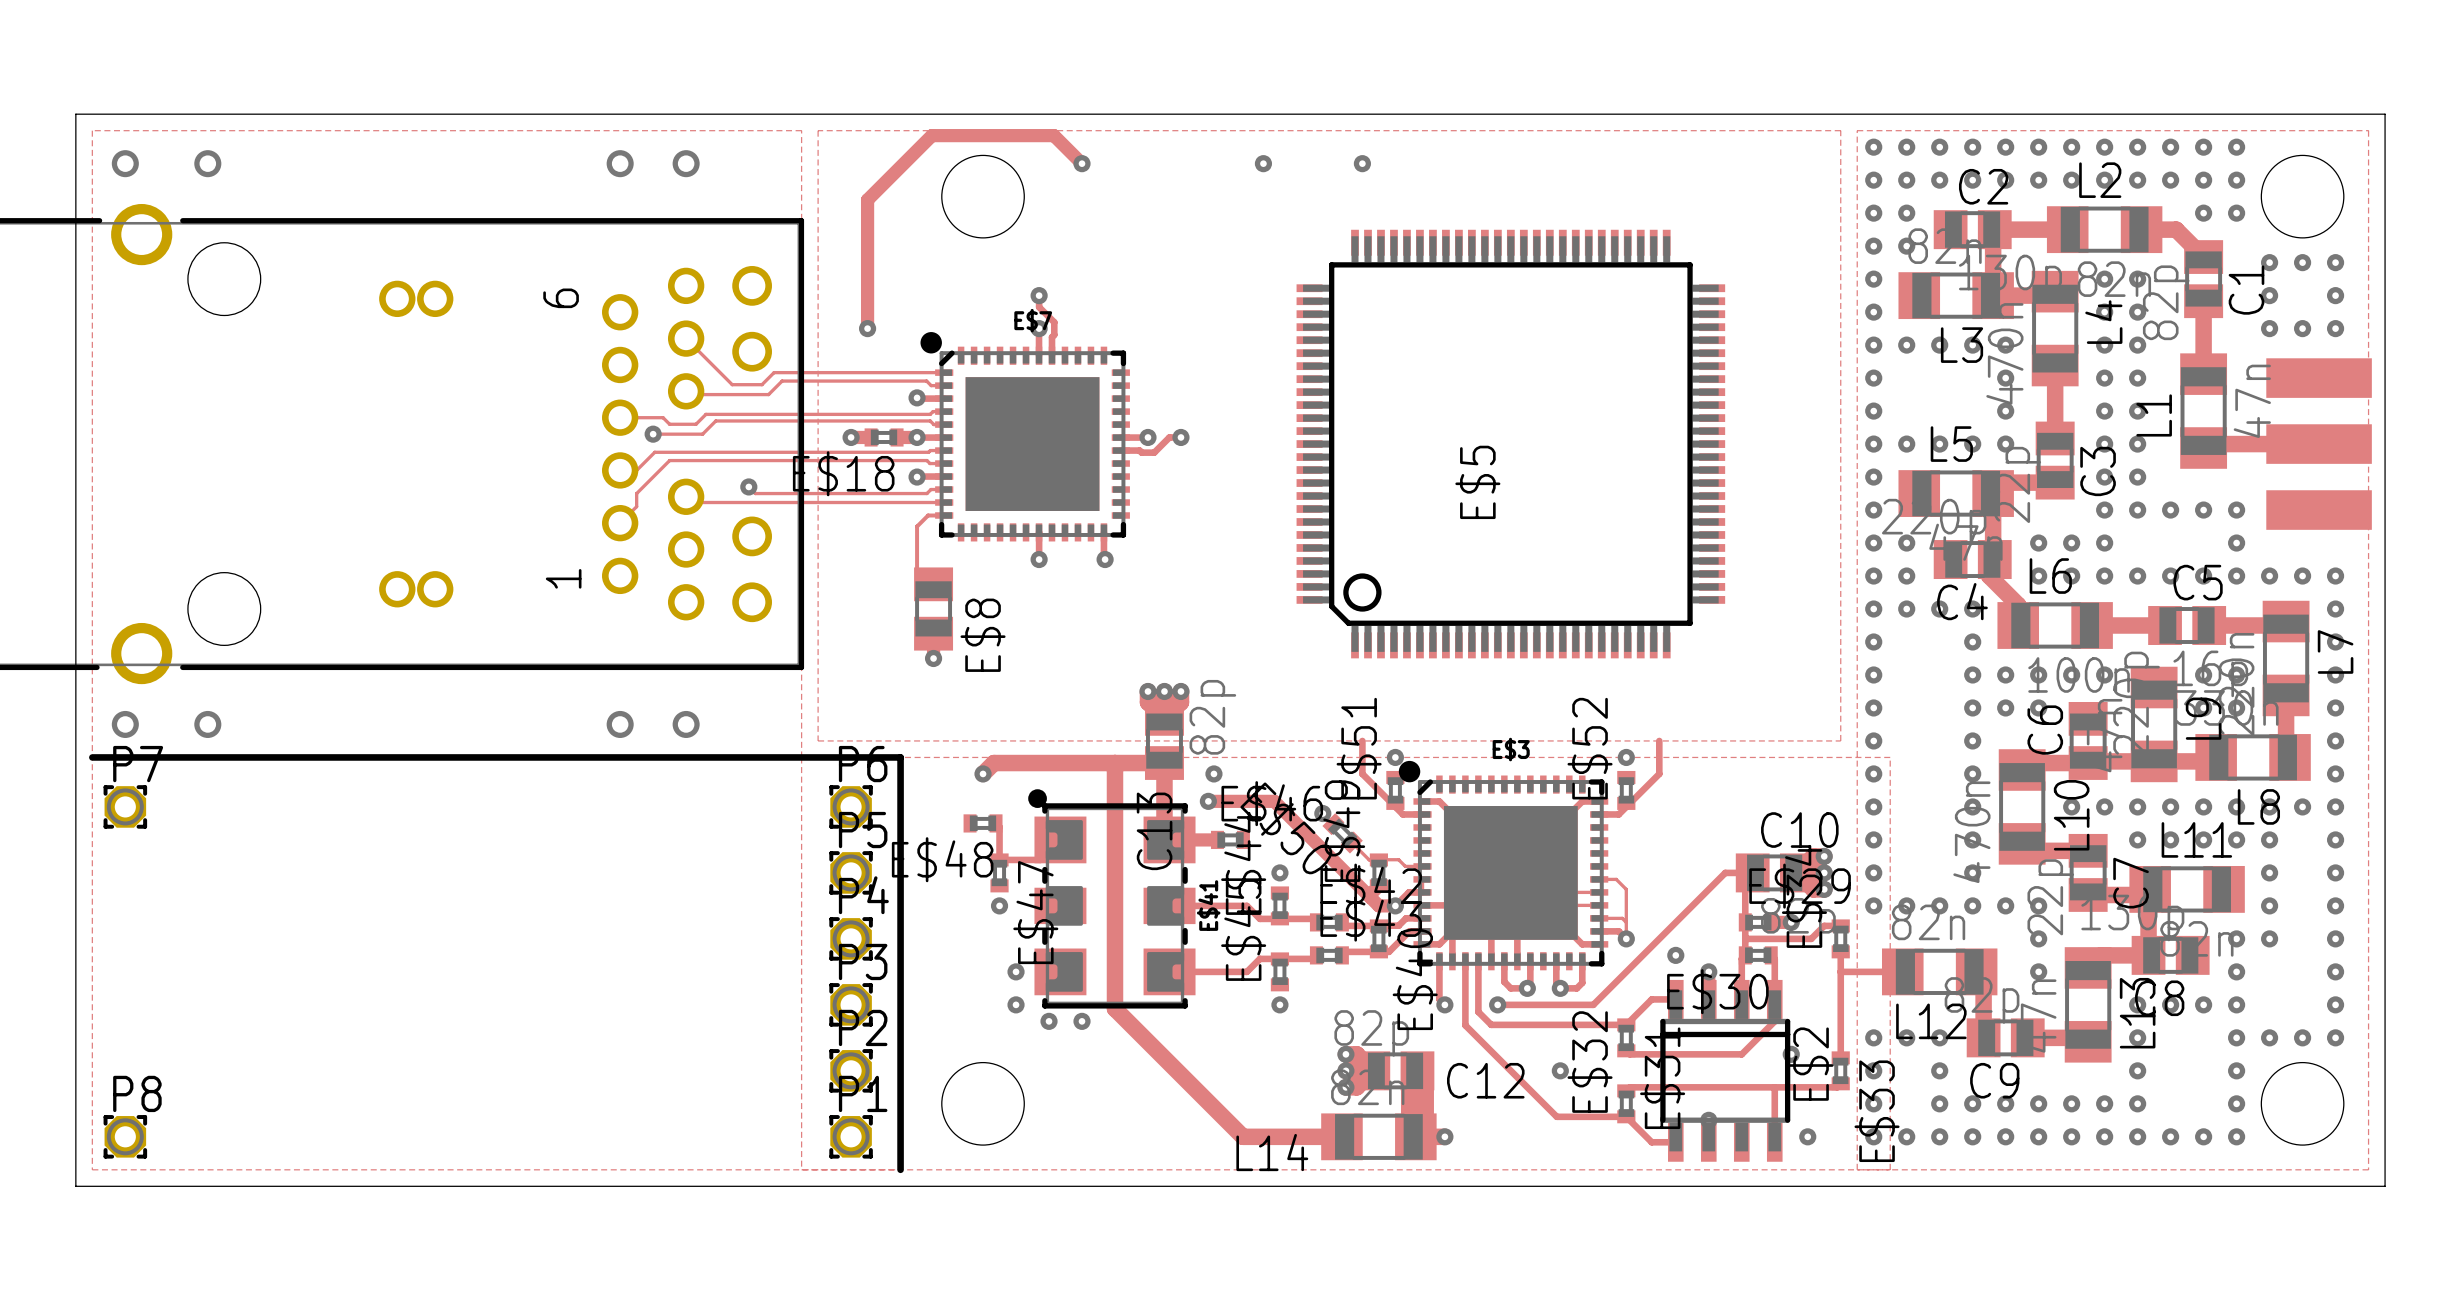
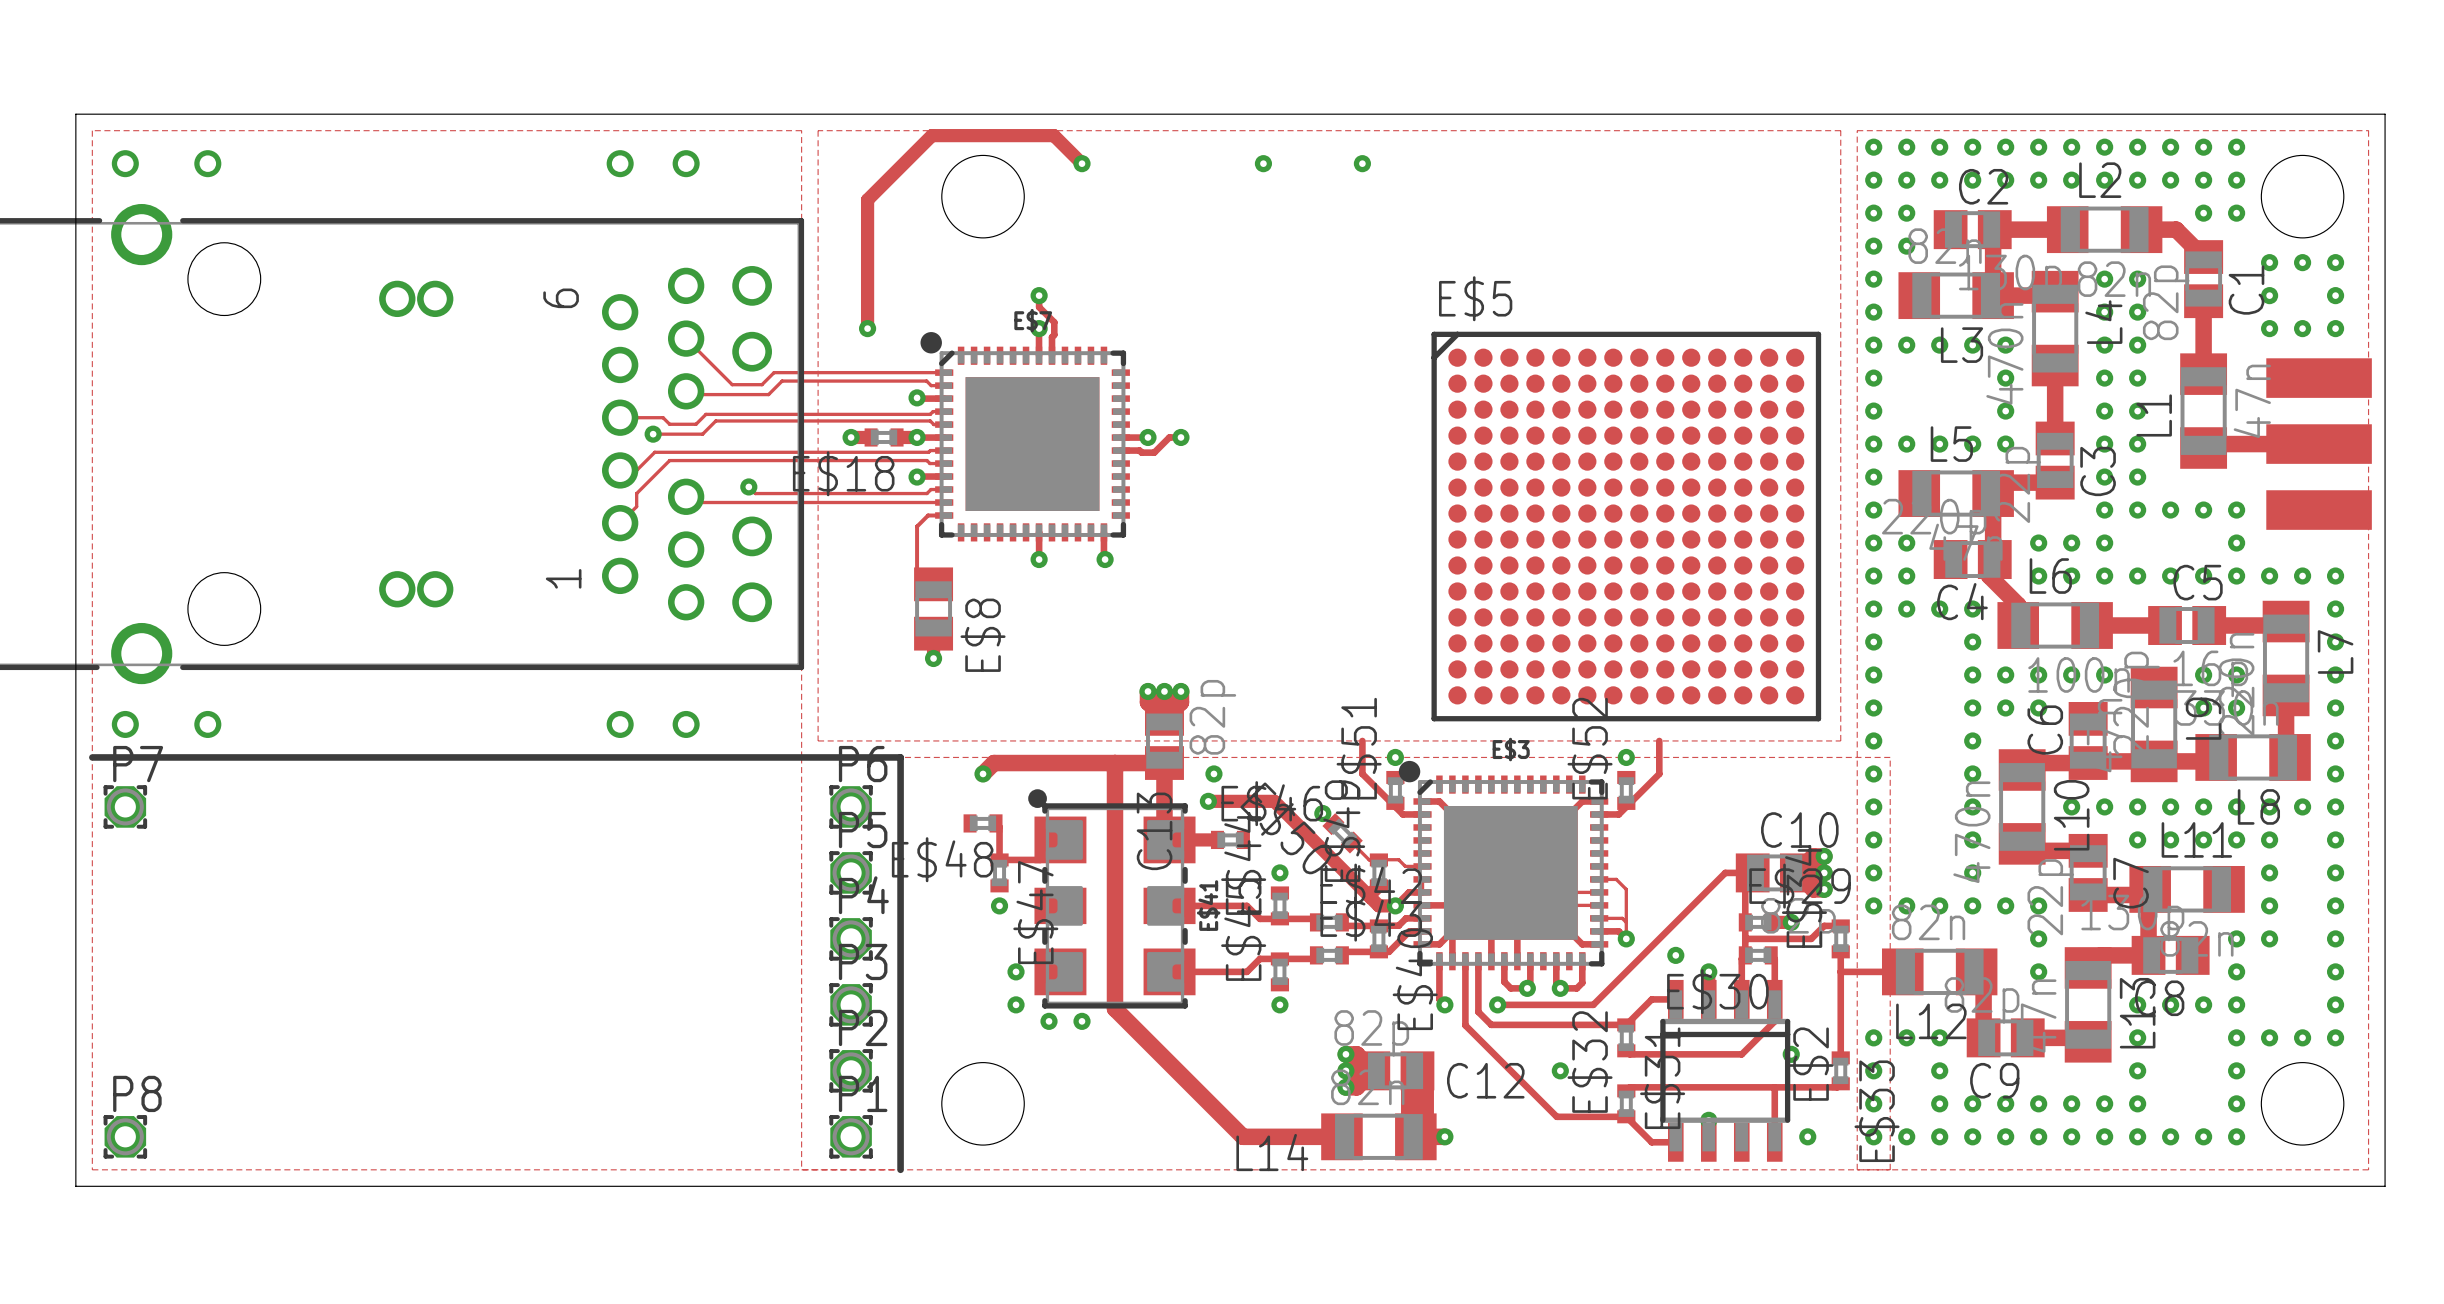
E$5 footprint: [1296, 229, 1726, 659] -> [1431, 331, 1822, 722]
E$5 name position: E$5 (1477, 482) -> E$5 (1475, 298)

